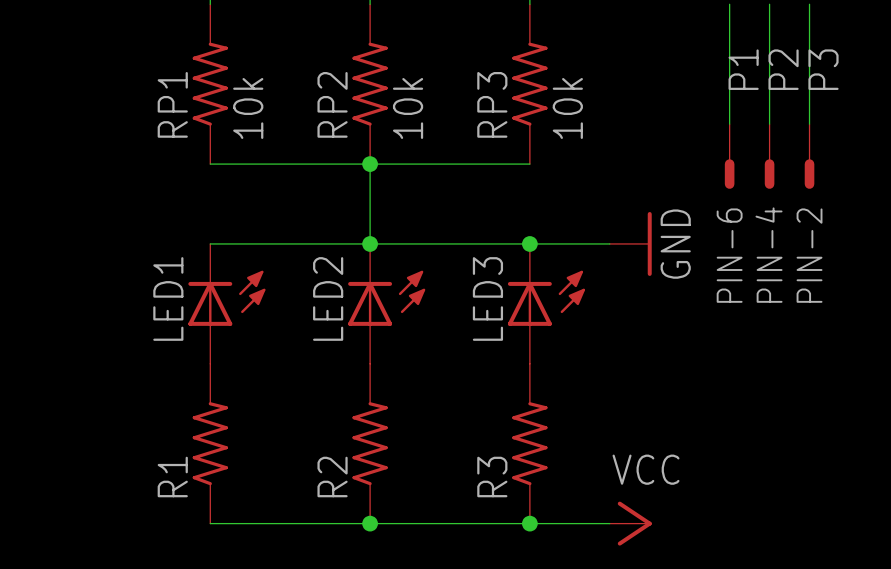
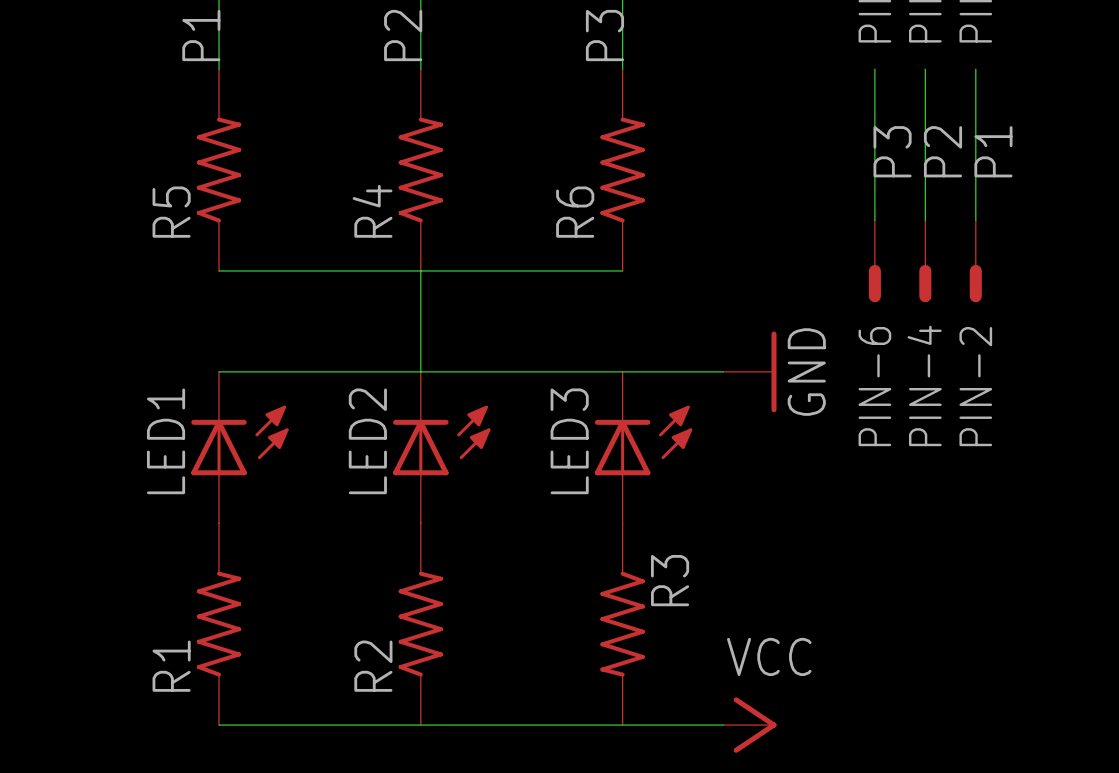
label: P1 (743, 69) -> P3 (892, 151)
label: P3 (823, 69) -> P1 (993, 151)
RP1 name: RP1 (172, 104) -> R5 (171, 212)
RP2 name: RP2 (332, 104) -> R4 (372, 211)
RP3 name: RP3 (492, 104) -> R6 (575, 212)
RP1 value: 10k (248, 108) -> none
RP2 value: 10k (408, 108) -> none
RP3 value: 10k (567, 108) -> none
junction: (370, 164) -> none
junction: (370, 243) -> none
junction: (529, 243) -> none
R3 rotation: 0° (529, 443) -> 180° (622, 624)
junction: (370, 523) -> none
junction: (529, 523) -> none

